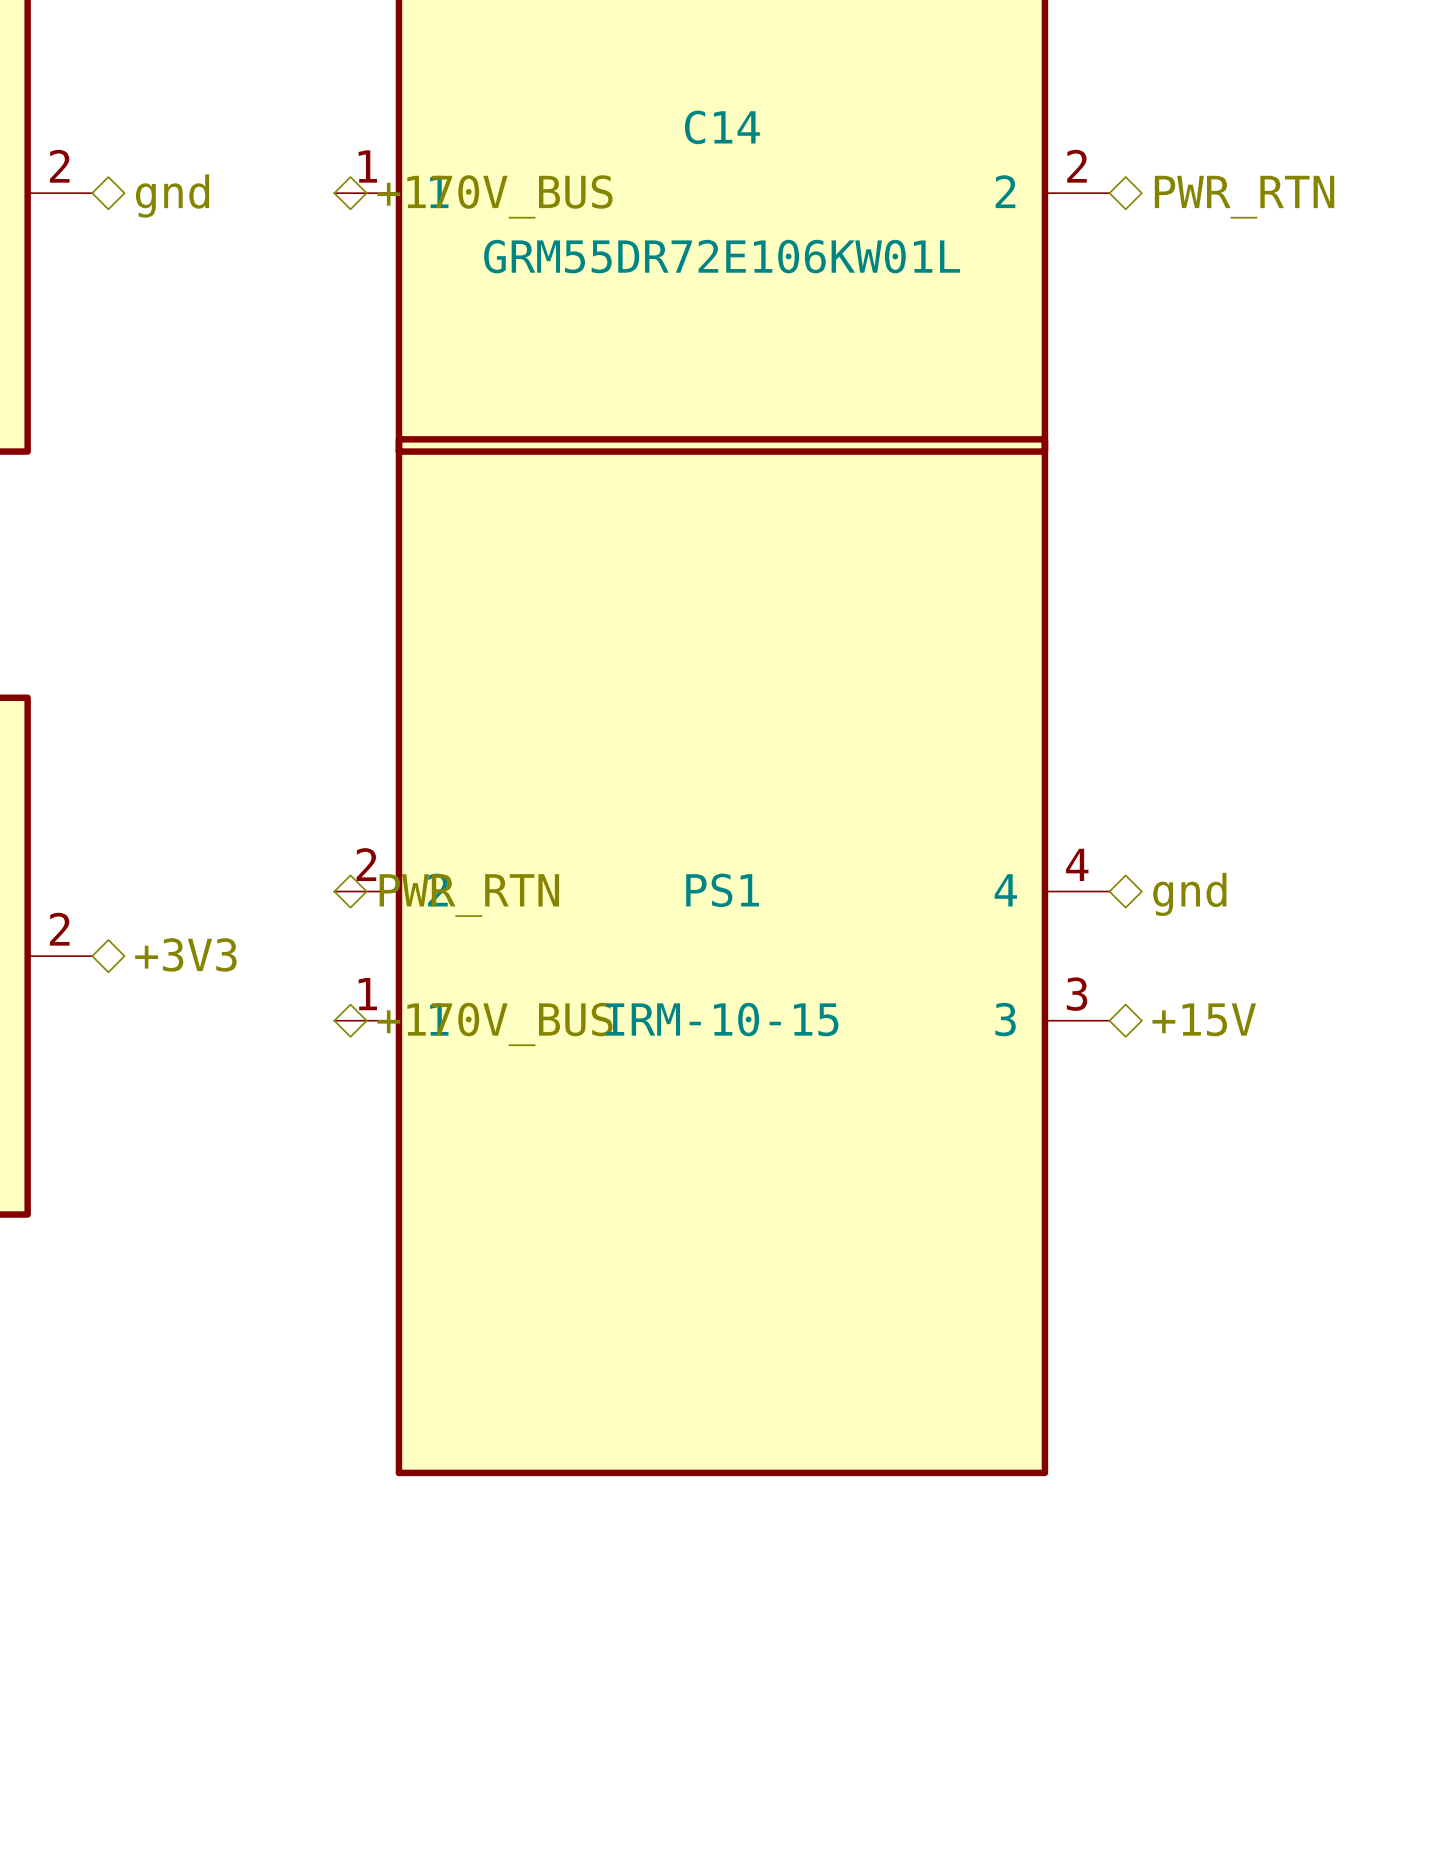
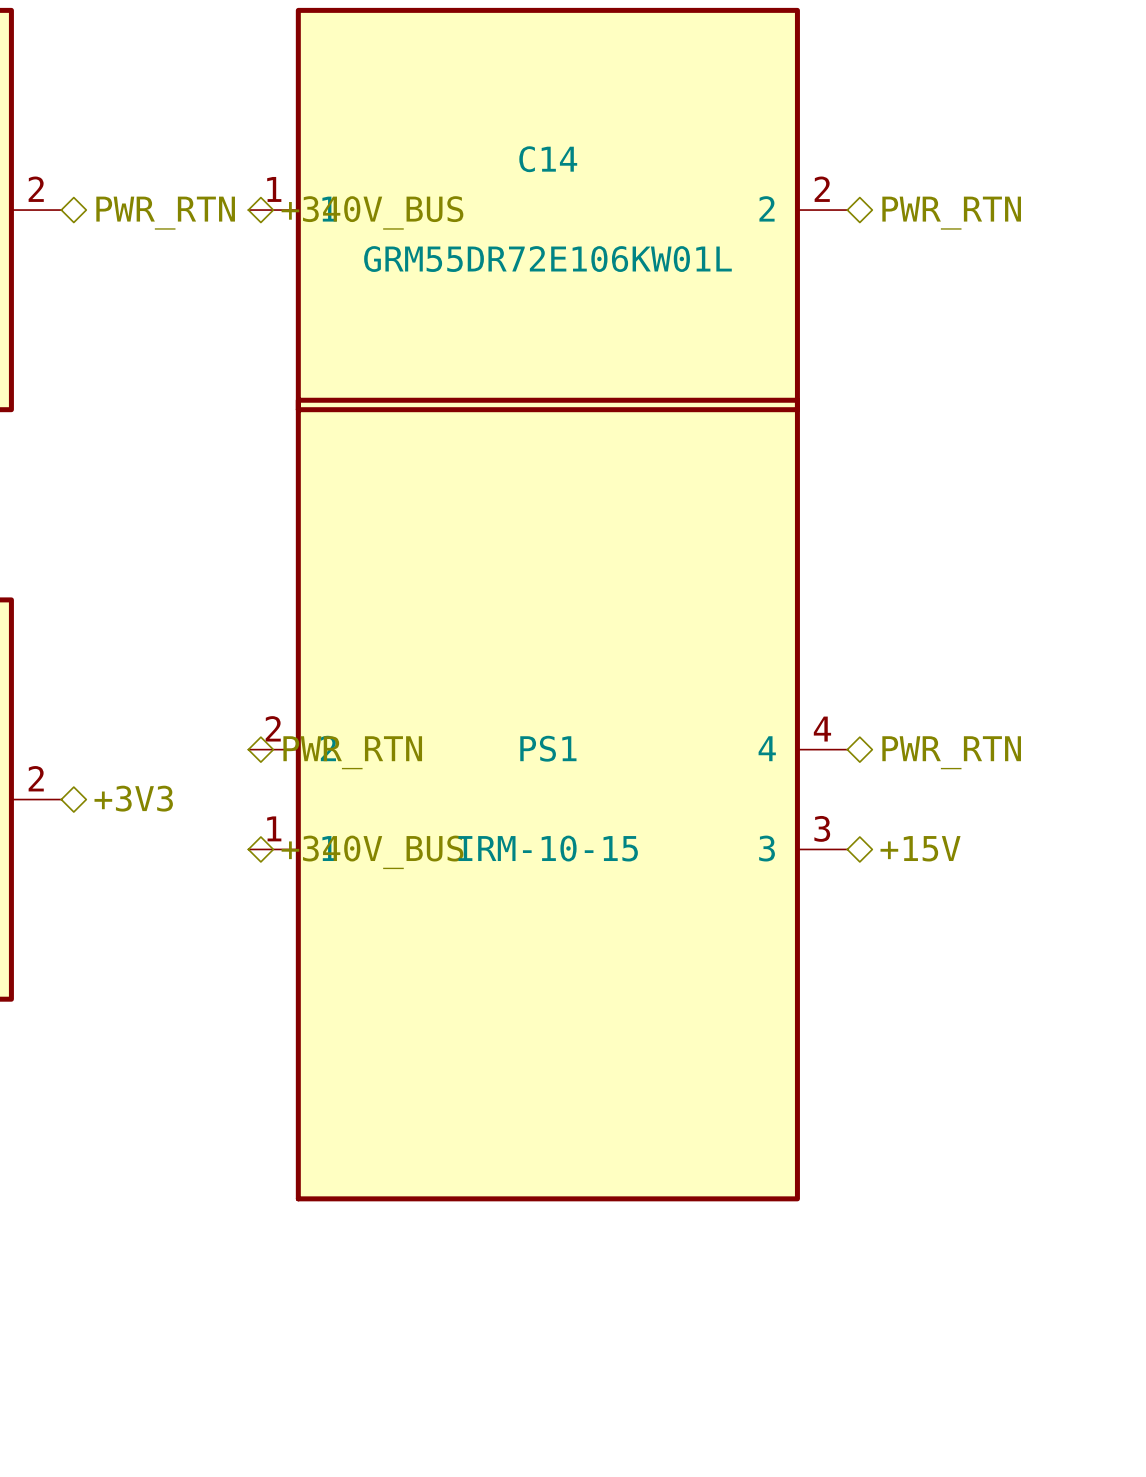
hierarchical label: gnd (172, 196) -> PWR_RTN (165, 213)
hierarchical label: +170V_BUS (494, 196) -> +340V_BUS (372, 212)
hierarchical label: gnd (1189, 894) -> PWR_RTN (951, 752)
hierarchical label: +170V_BUS (494, 1024) -> +340V_BUS (372, 852)

